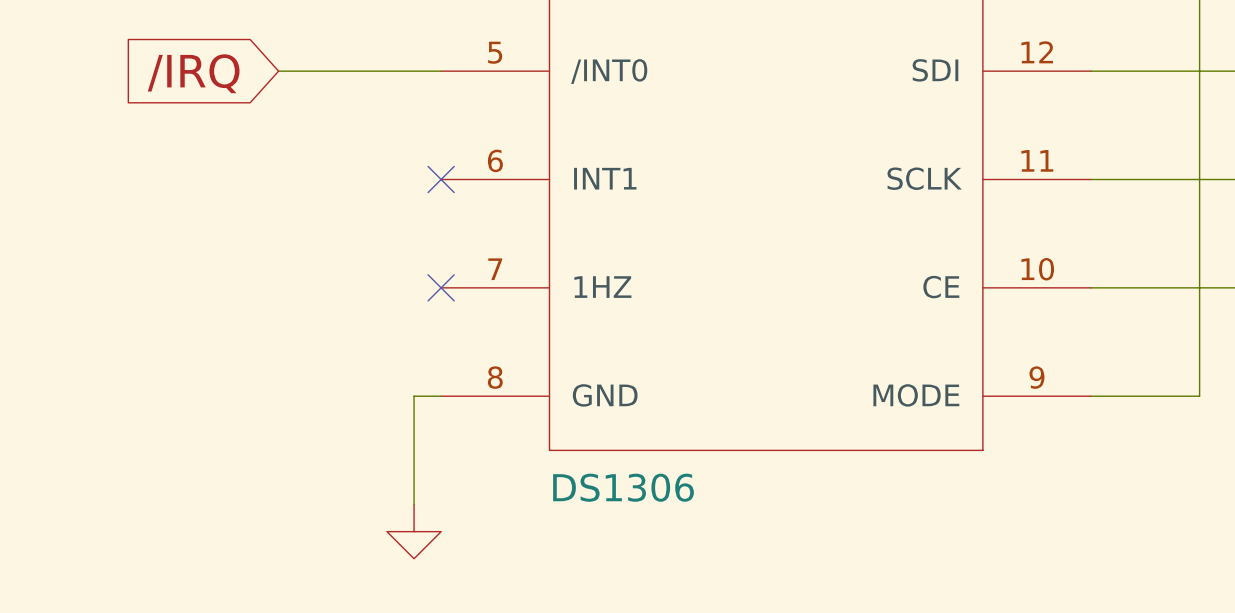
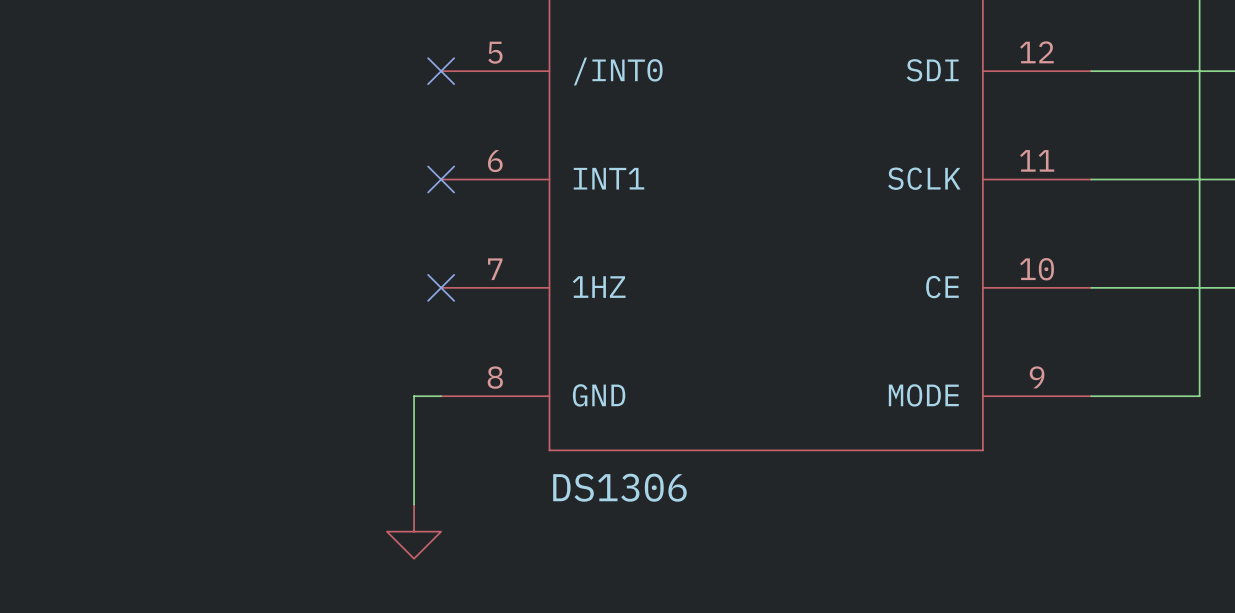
wire: (278, 71) (441, 71) -> none
no-connect mark: none -> (441, 71)
global label: /IRQ (193, 73) -> none

